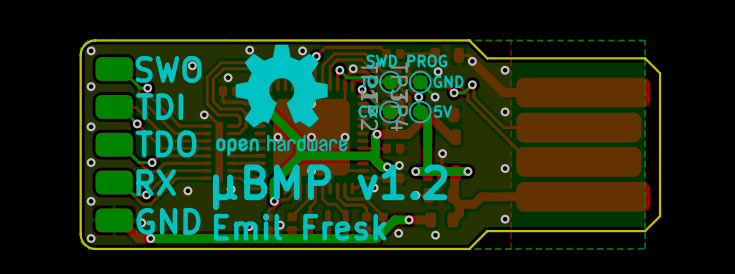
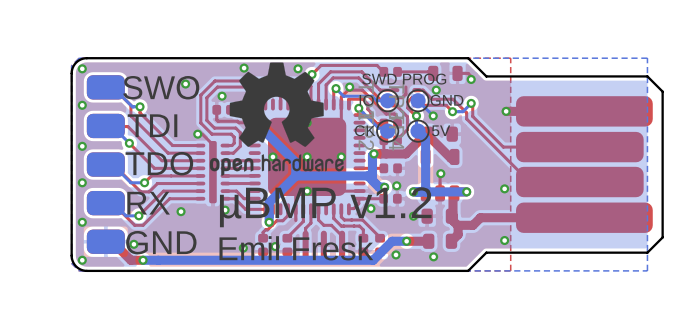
top track: (472, 61) (503, 92) (506, 92) -> none
via: (505, 70) -> none
via: none -> (506, 111)
via: (505, 111) -> none

